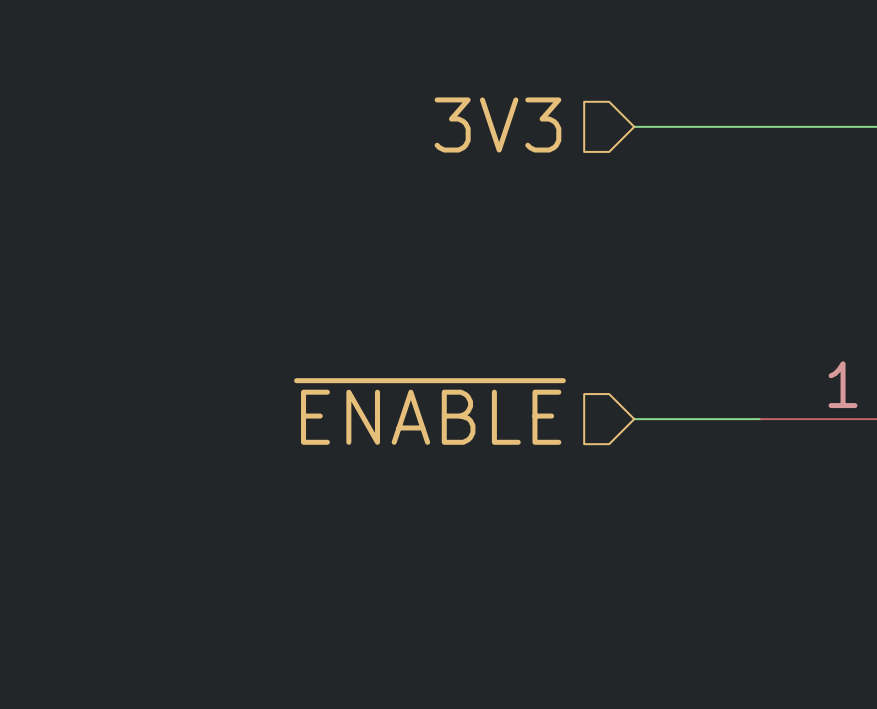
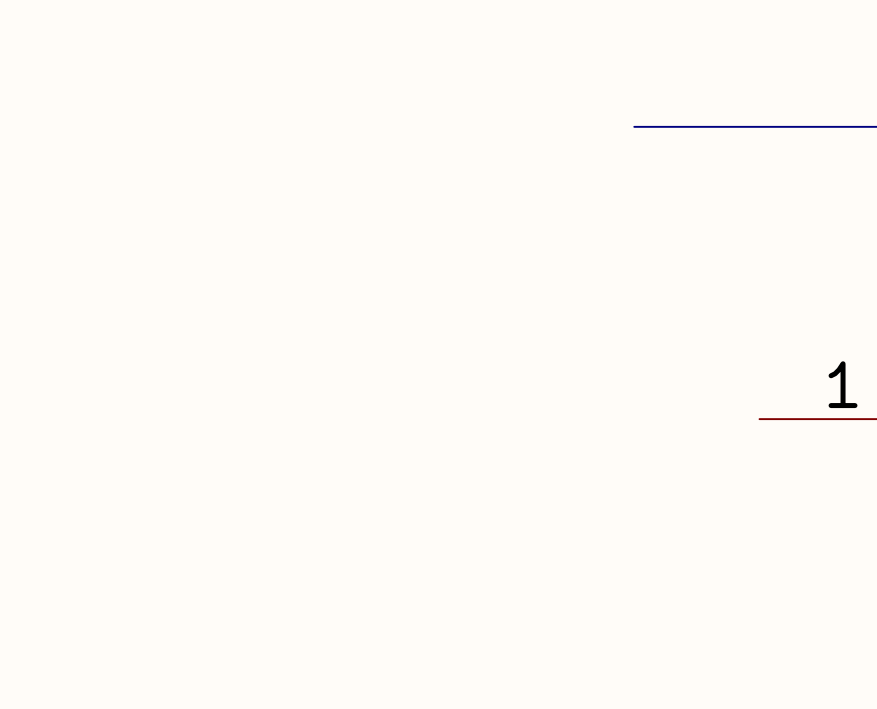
hierarchical label: 3V3 (497, 124) -> none
hierarchical label: ~{ENABLE} (429, 411) -> none
wire: (634, 419) (759, 419) -> none

